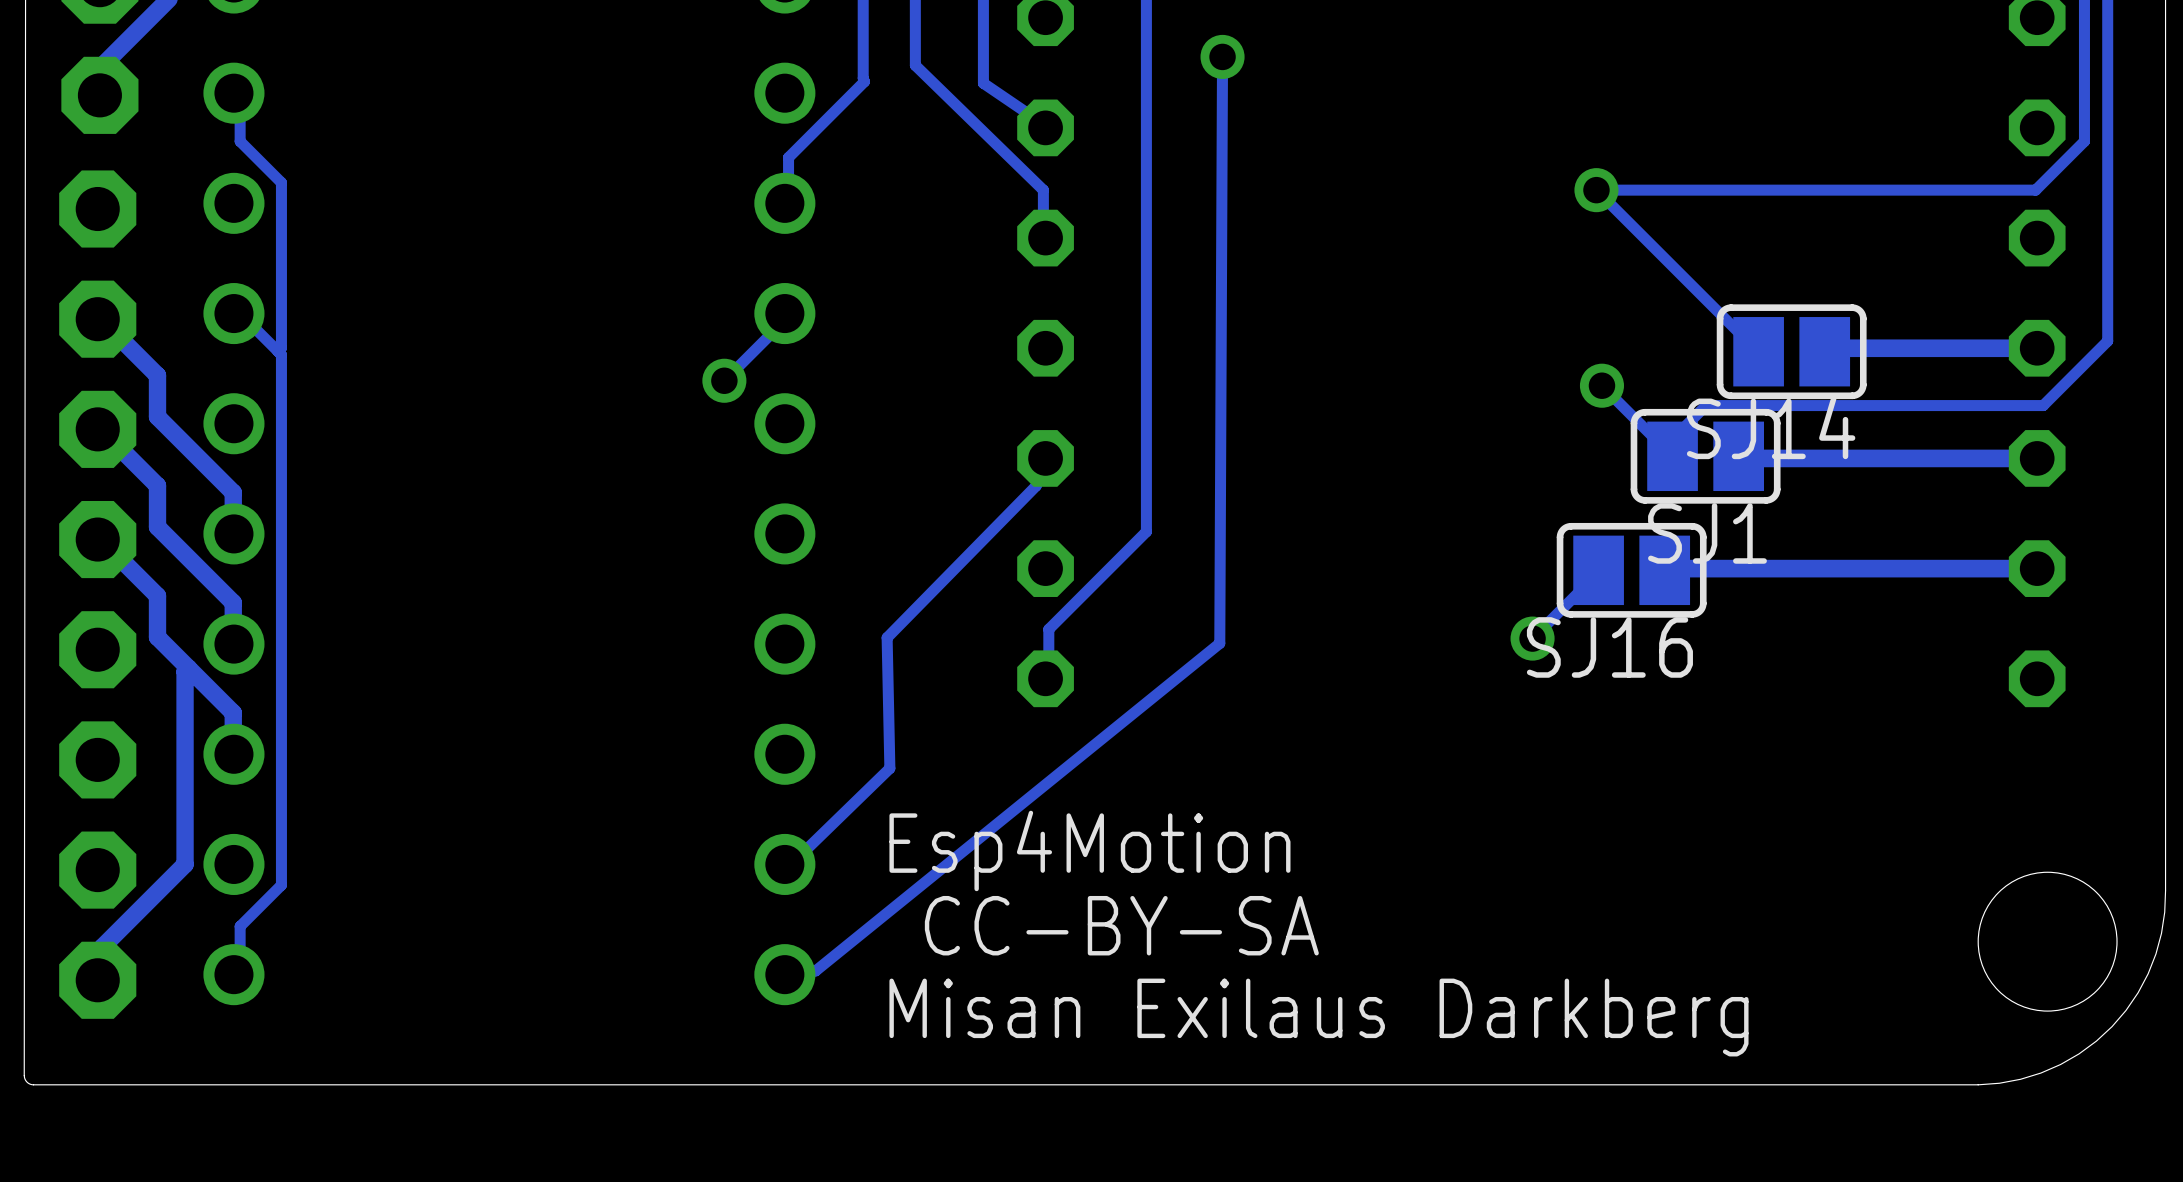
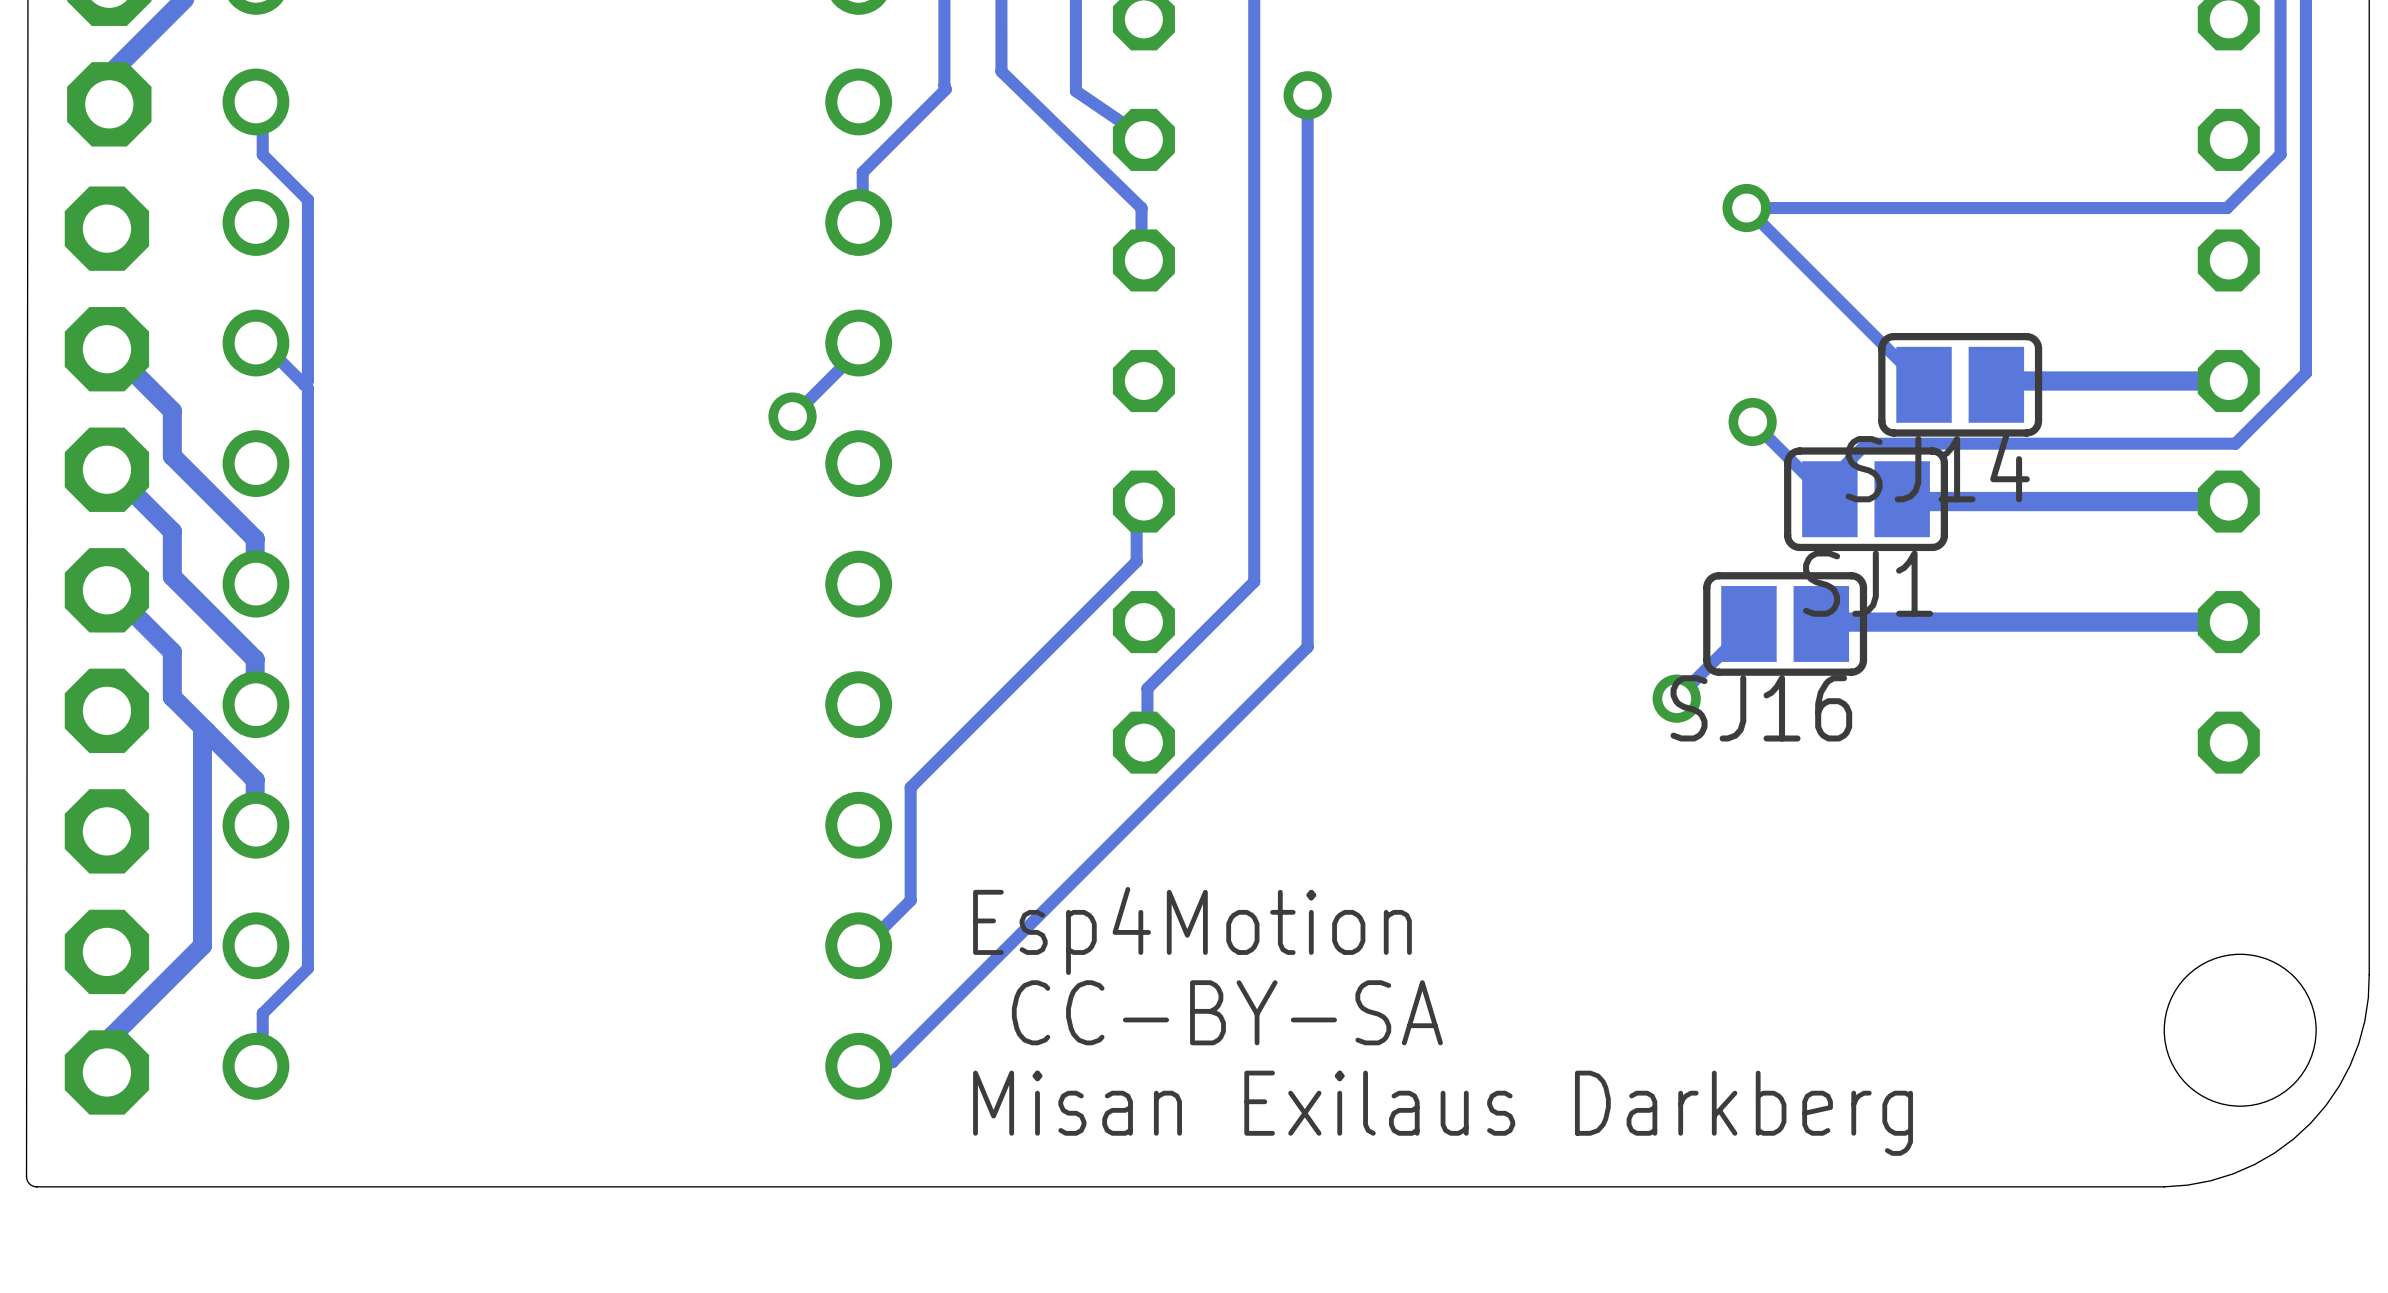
track: (1222, 56) (1219, 643) (815, 970) -> (1307, 95) (1307, 647) (892, 1062)
via position: (1222, 56) -> (1307, 95)
track: (1038, 465) (1036, 485) (887, 637) (889, 768) (791, 864) -> (1136, 508) (1136, 561) (910, 787) (910, 900) (865, 945)

